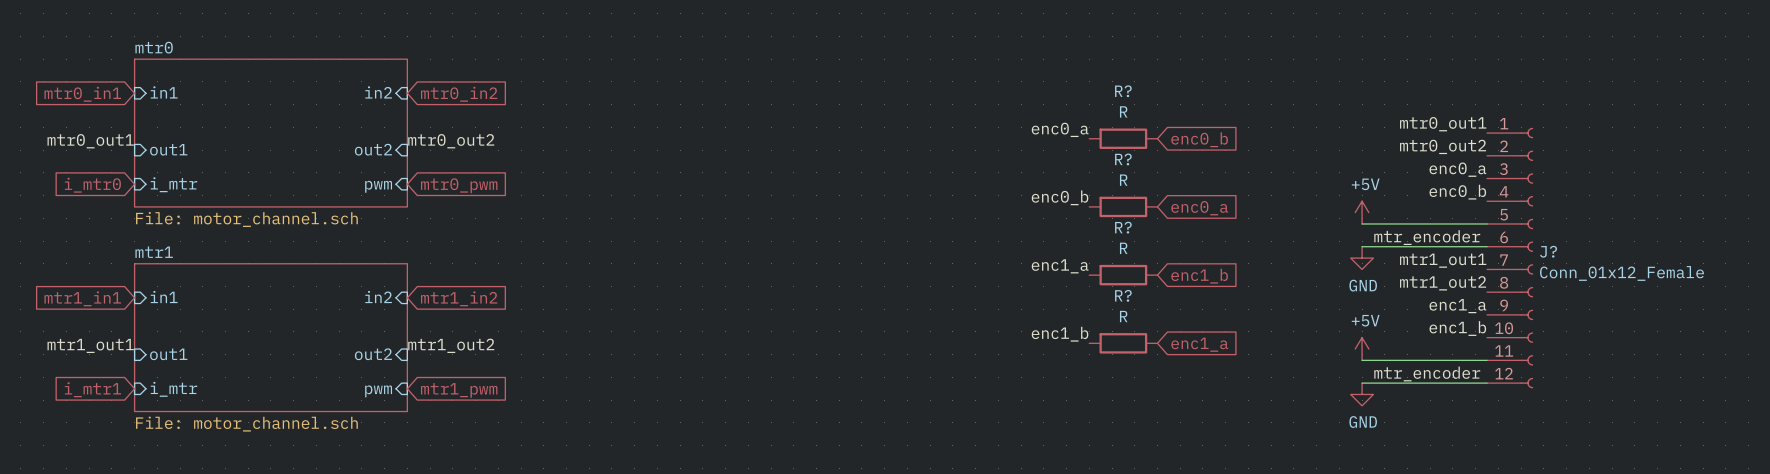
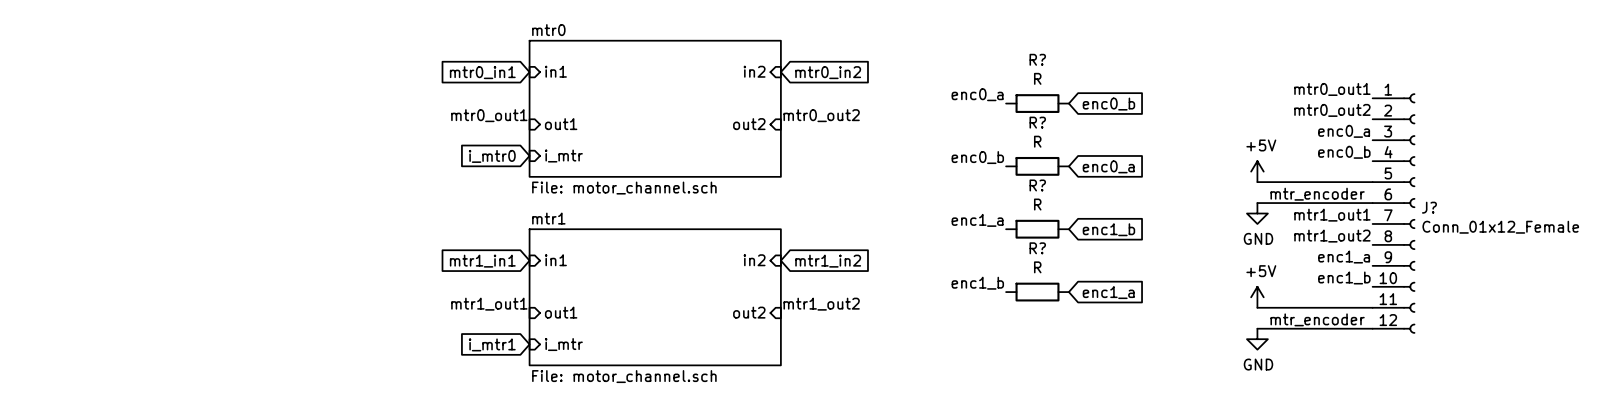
sheet pin: in1 (164, 92) -> none
sheet pin: in2 (378, 92) -> none
global label: mtr0_in1 (82, 94) -> none
global label: mtr0_in2 (459, 94) -> mtr0_in1 (482, 72)
sheet pin: none -> in1 (555, 71)
sheet pin: none -> in2 (754, 71)
global label: none -> mtr0_in2 (828, 72)
sheet mtr0 position: (270, 133) -> (655, 108)
label: mtr0_out1 (90, 141) -> none
label: mtr0_out2 (451, 141) -> mtr0_out1 (489, 115)
sheet pin: out1 (168, 149) -> none
sheet pin: out2 (373, 149) -> none
label: none -> mtr0_out2 (821, 115)
sheet pin: none -> out1 (561, 124)
sheet pin: none -> out2 (749, 124)
sheet pin: i_mtr (173, 184) -> none
global label: i_mtr0 (92, 185) -> none
global label: mtr0_pwm (459, 185) -> none
sheet pin: pwm (378, 186) -> none
global label: none -> i_mtr0 (492, 156)
sheet pin: none -> i_mtr (563, 156)
sheet pin: in1 (164, 297) -> none
sheet pin: in2 (378, 297) -> none
global label: mtr1_in1 (82, 298) -> none
global label: mtr1_in2 (459, 298) -> mtr1_in1 (482, 261)
sheet pin: none -> in1 (555, 260)
sheet pin: none -> in2 (754, 260)
global label: none -> mtr1_in2 (828, 261)
sheet mtr1 position: (270, 337) -> (655, 297)
label: mtr1_out1 (90, 345) -> none
label: mtr1_out2 (451, 345) -> mtr1_out1 (489, 304)
sheet pin: out1 (168, 354) -> none
sheet pin: out2 (373, 354) -> none
label: none -> mtr1_out2 (821, 304)
sheet pin: none -> out1 (561, 312)
sheet pin: none -> out2 (749, 312)
global label: i_mtr1 (92, 389) -> none
sheet pin: i_mtr (173, 389) -> none
global label: mtr1_pwm (459, 390) -> none
sheet pin: pwm (378, 391) -> none
sheet pin: none -> i_mtr (563, 344)
global label: none -> i_mtr1 (492, 344)

